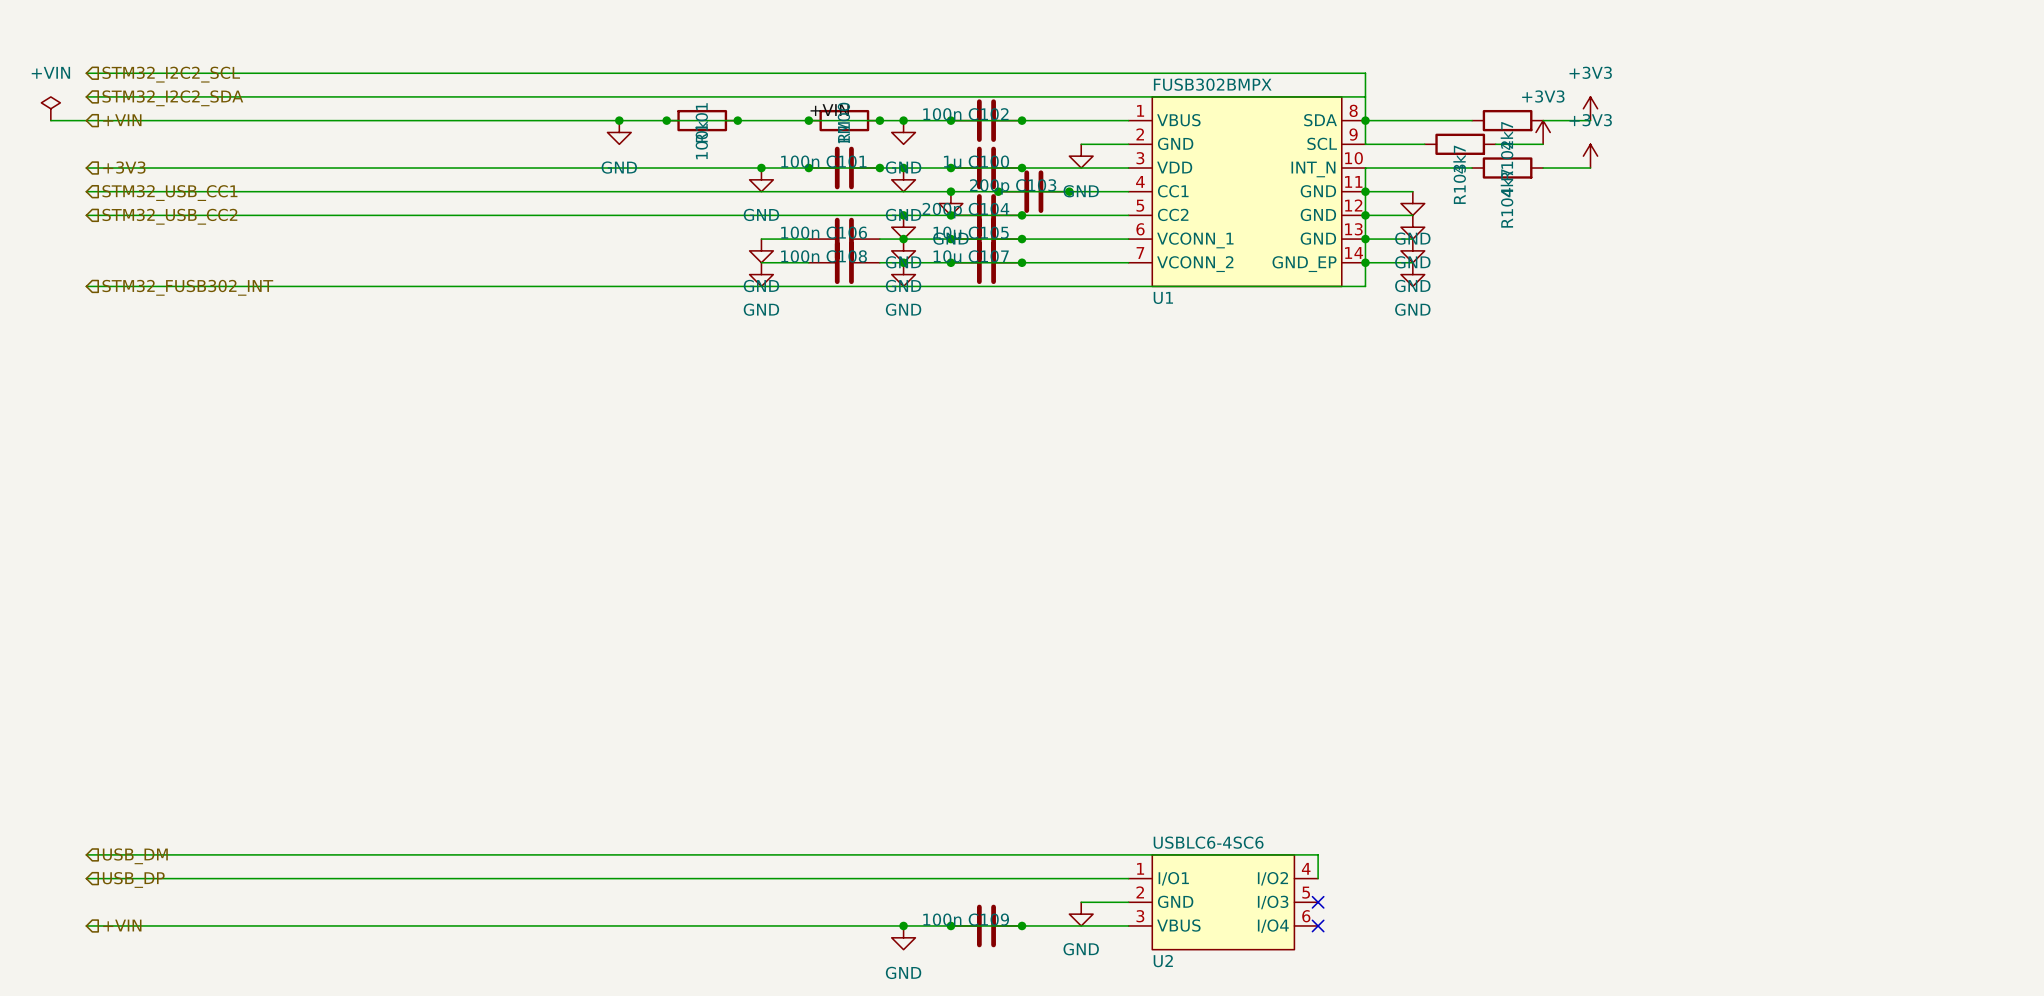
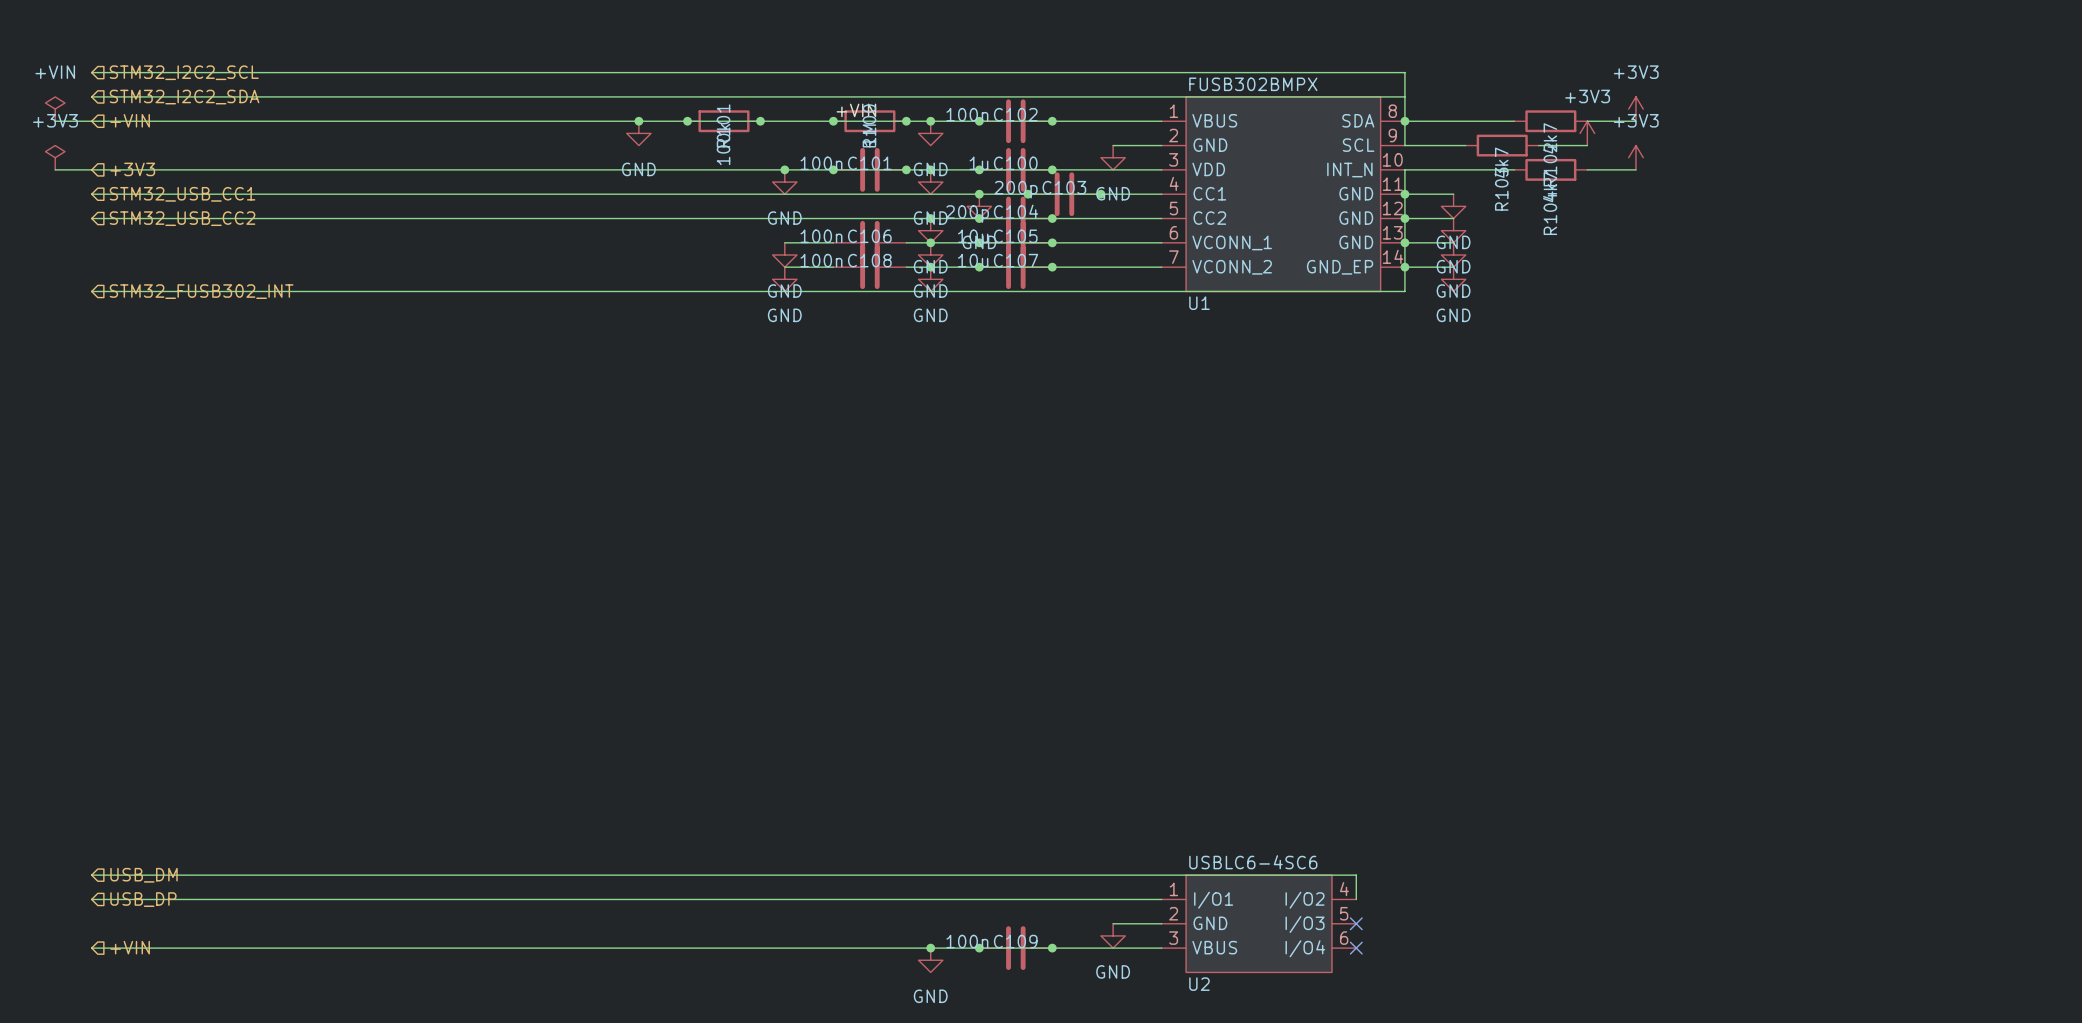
power symbol: none -> +3V3 (55, 157)
wire: none -> (55, 169) (91, 169)

